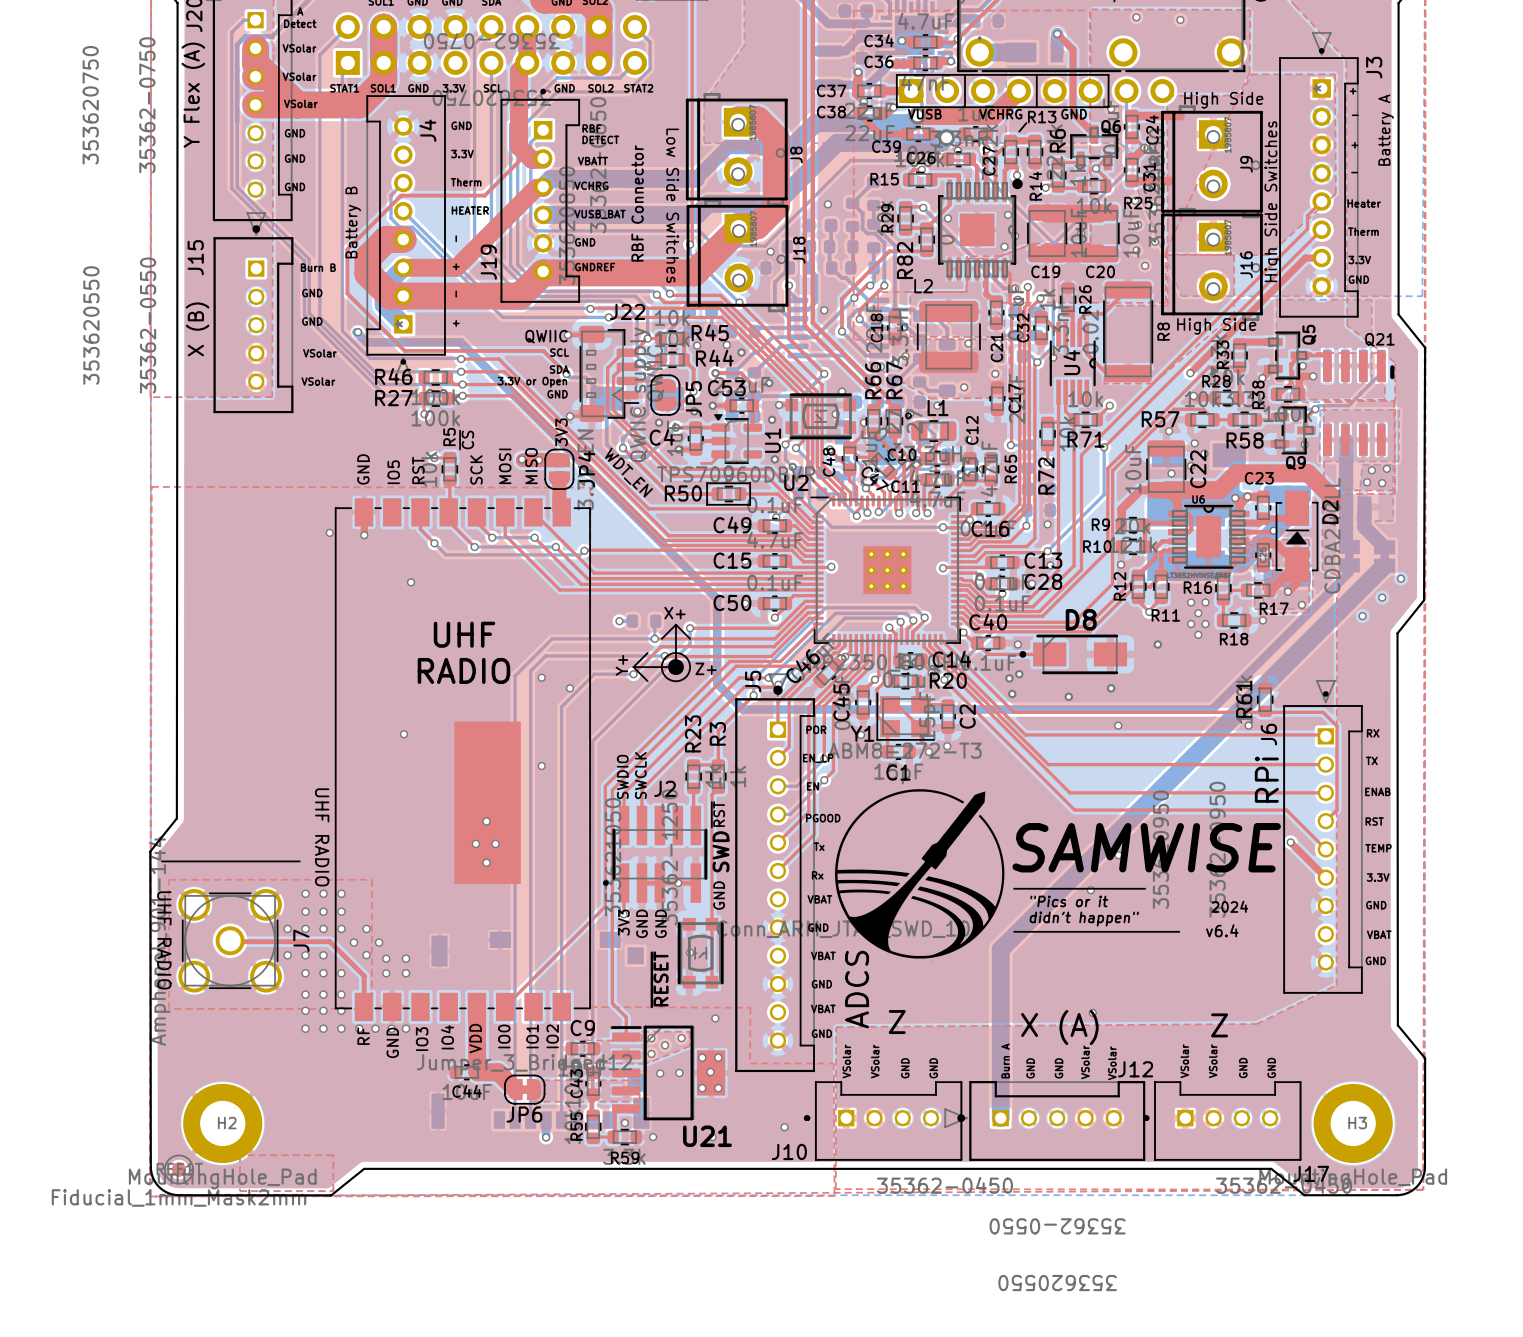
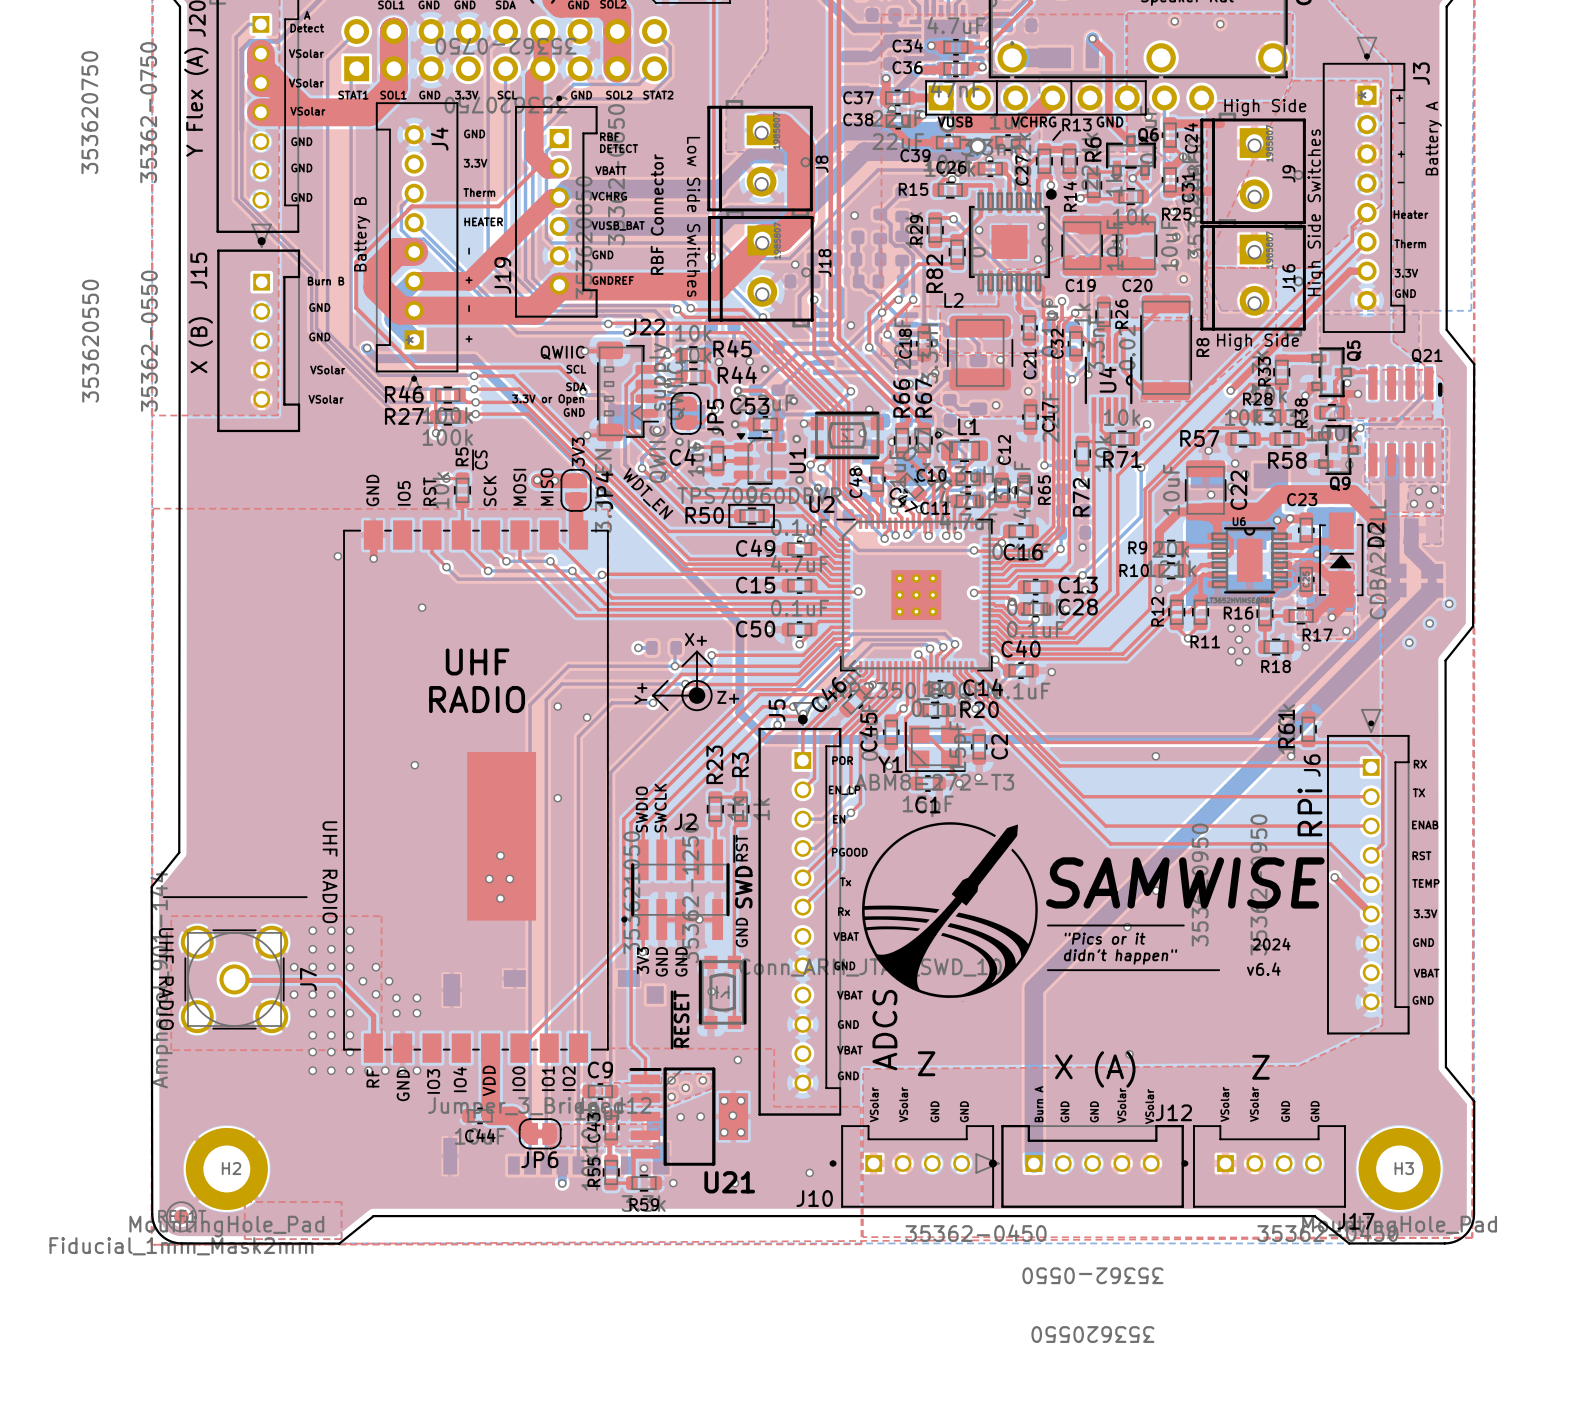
top track: (977, 643) (988, 654) (1049, 654) -> none
via: (1157, 644) -> none
D8: (1073, 654) -> none
via: (1019, 674) -> none
via: (1009, 678) -> none
via: (1111, 688) -> none
via: (1012, 693) -> none
via: (1068, 696) -> none

